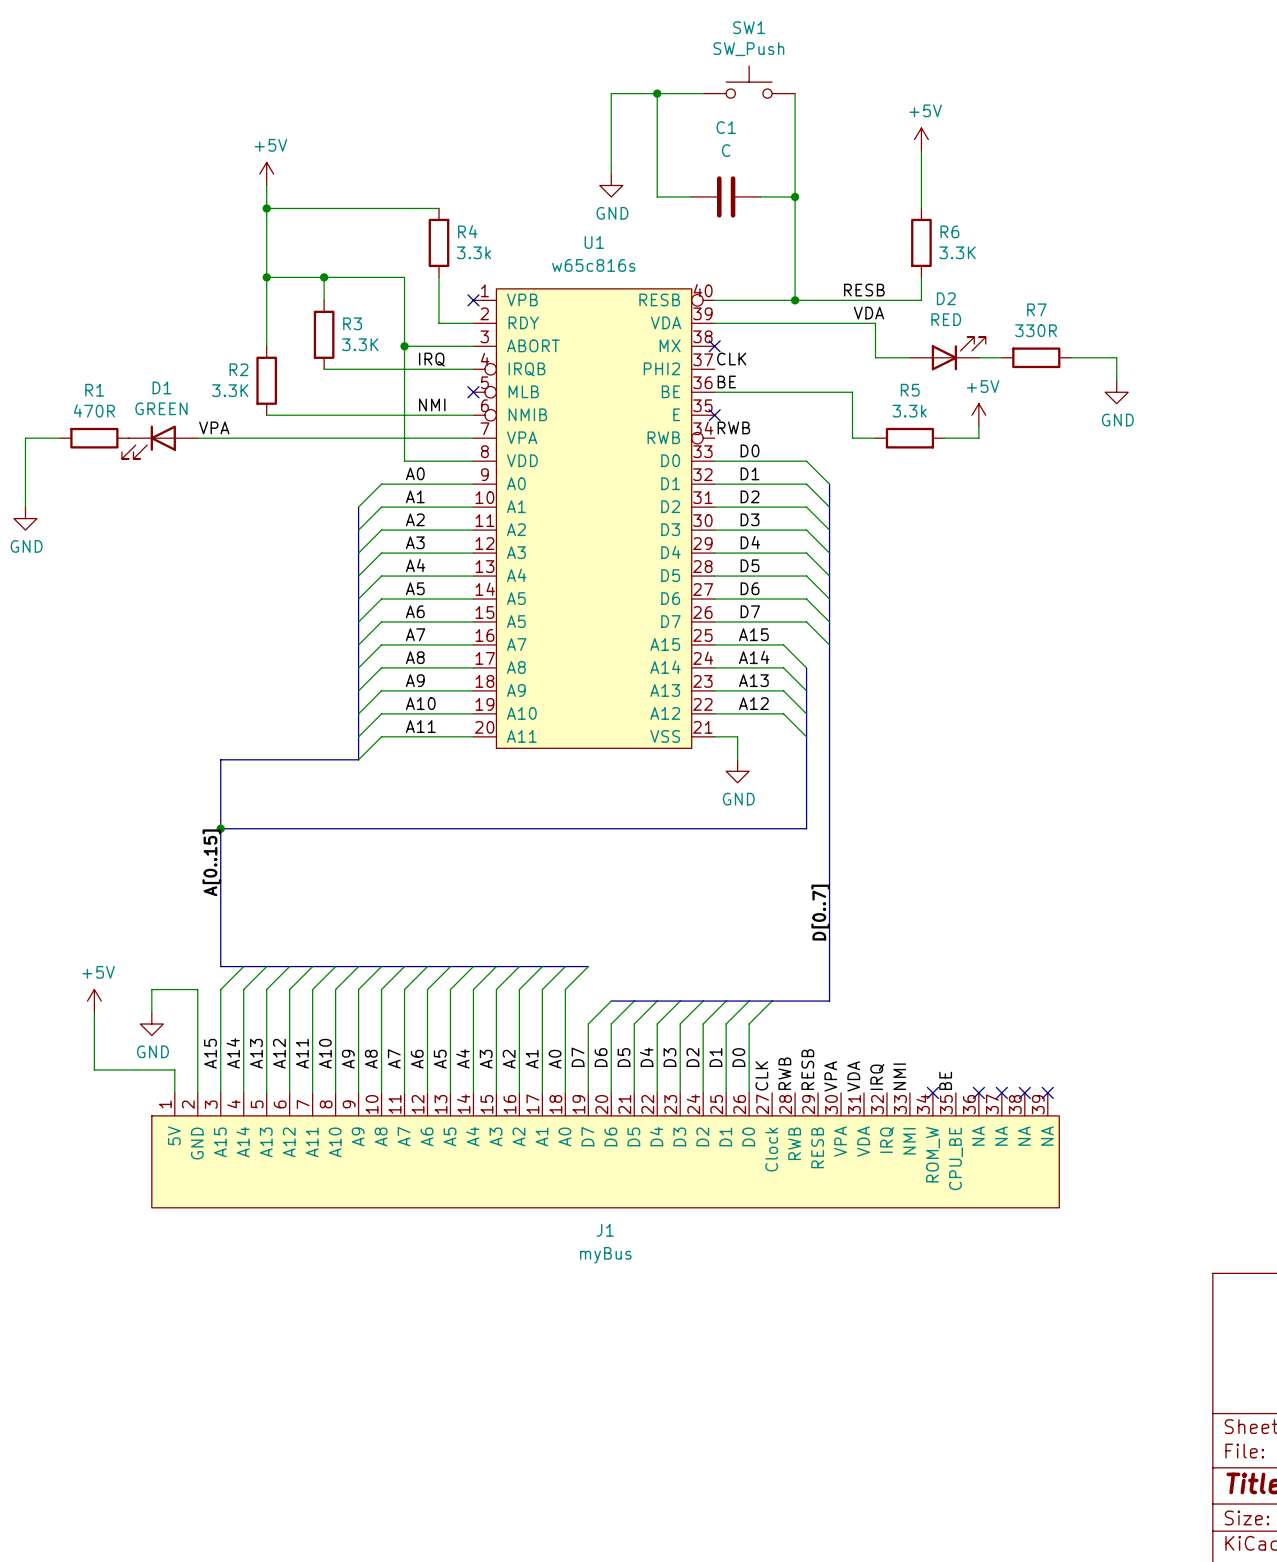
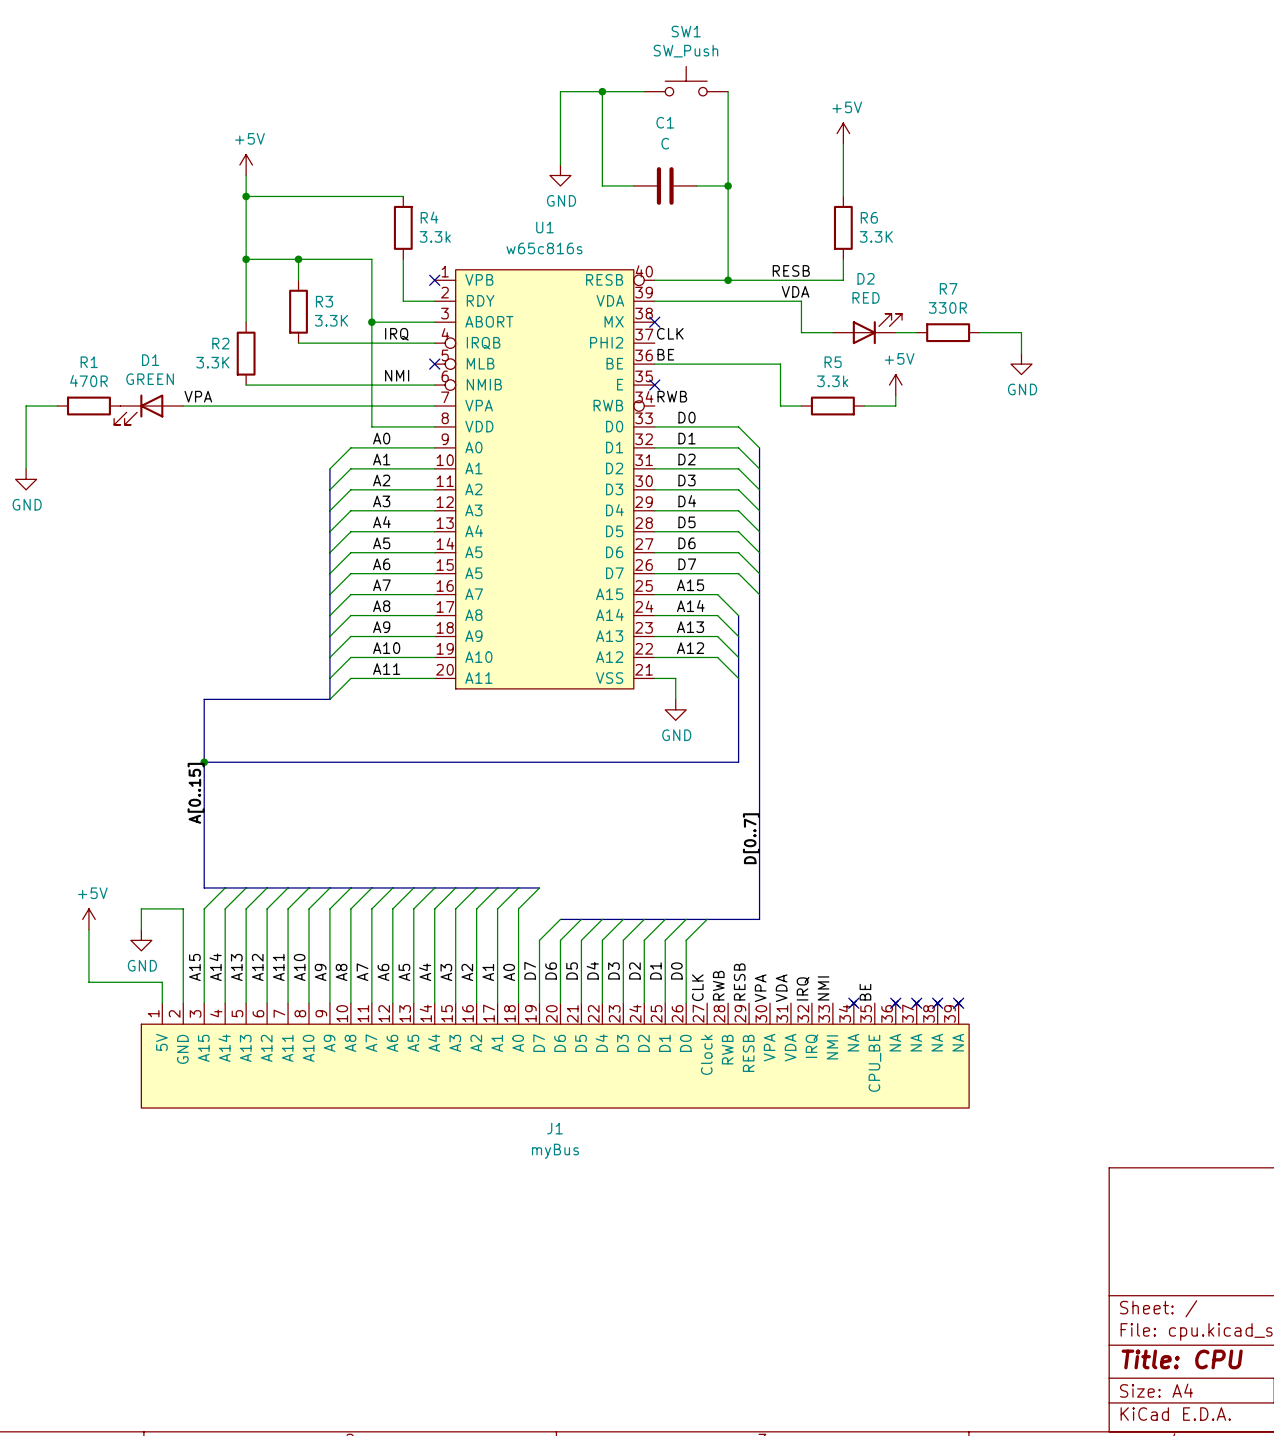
J1 symbol: [151, 1092, 1060, 1208] -> [141, 1000, 970, 1109]

